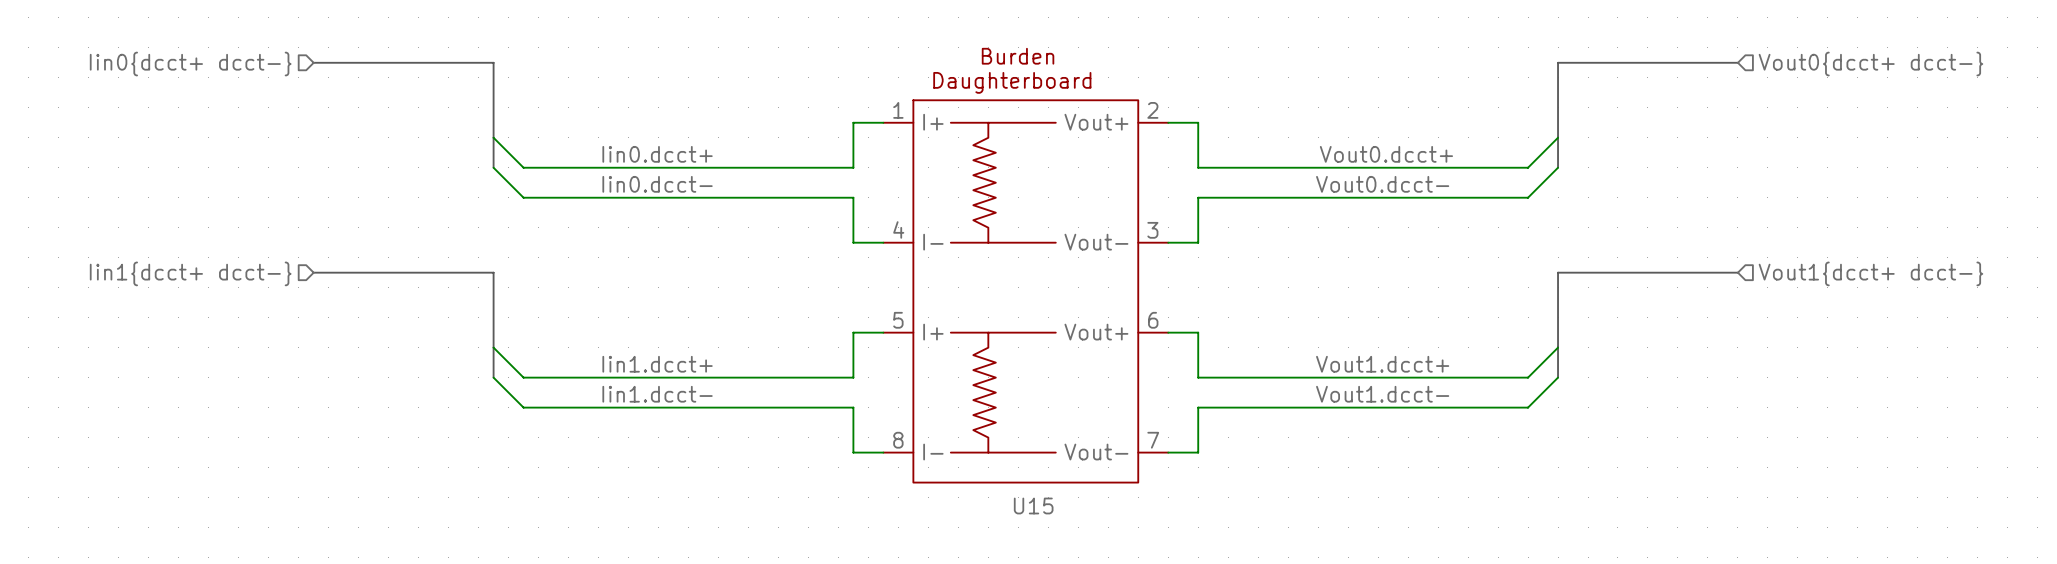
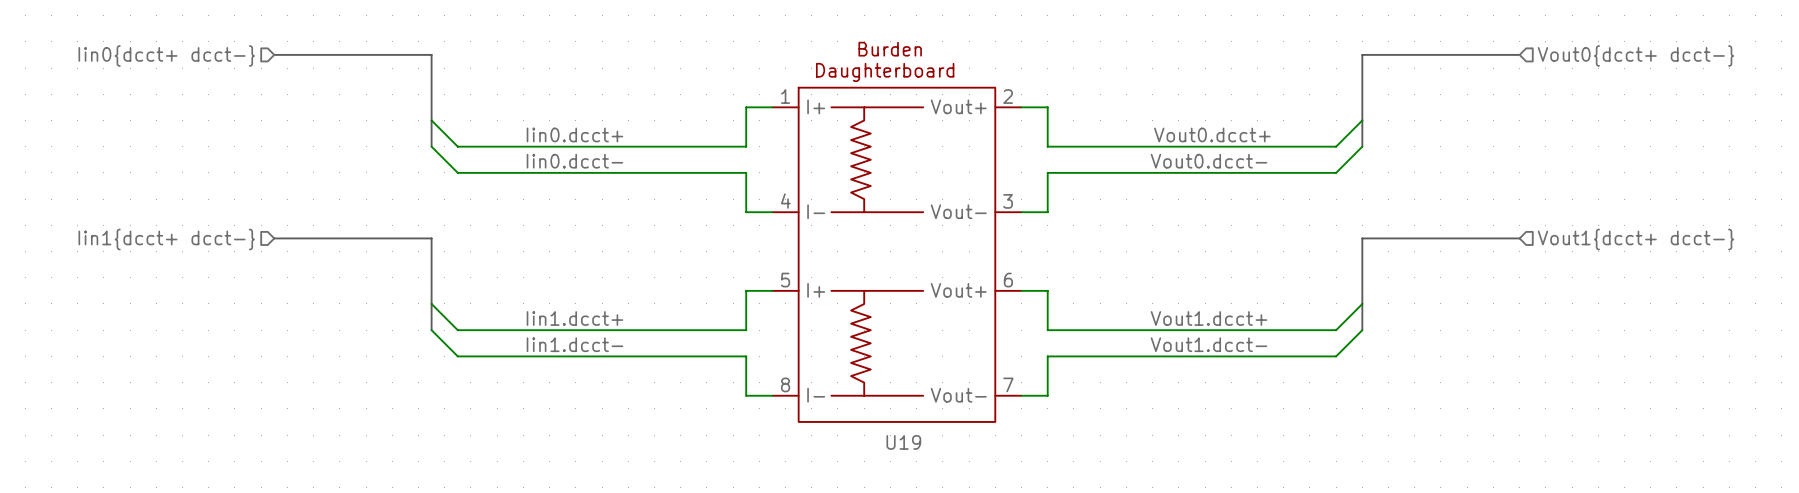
U15 name: U15 (1033, 506) -> U19 (903, 442)

